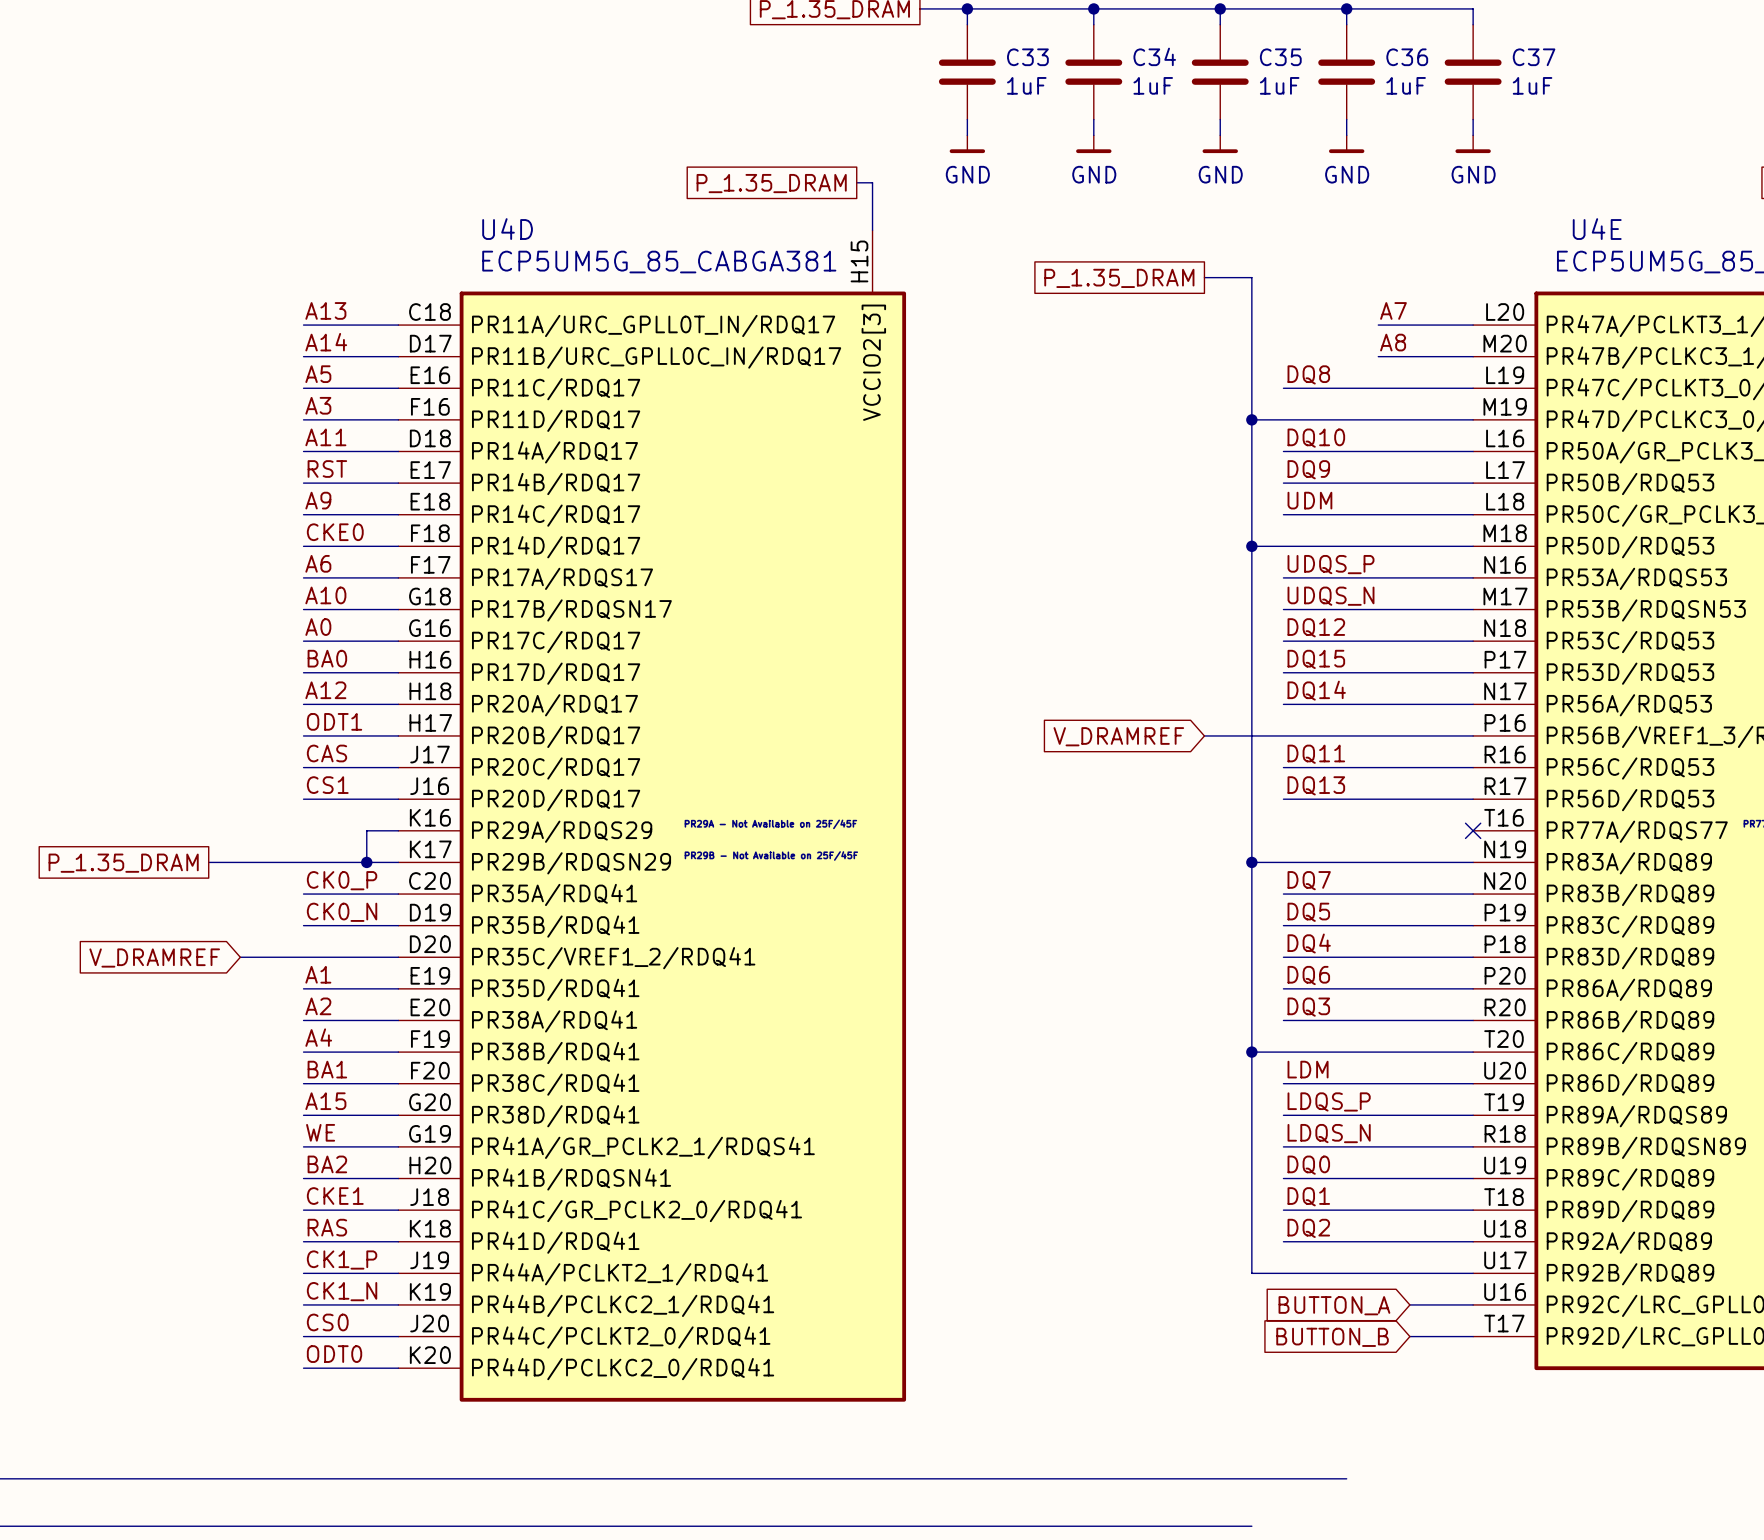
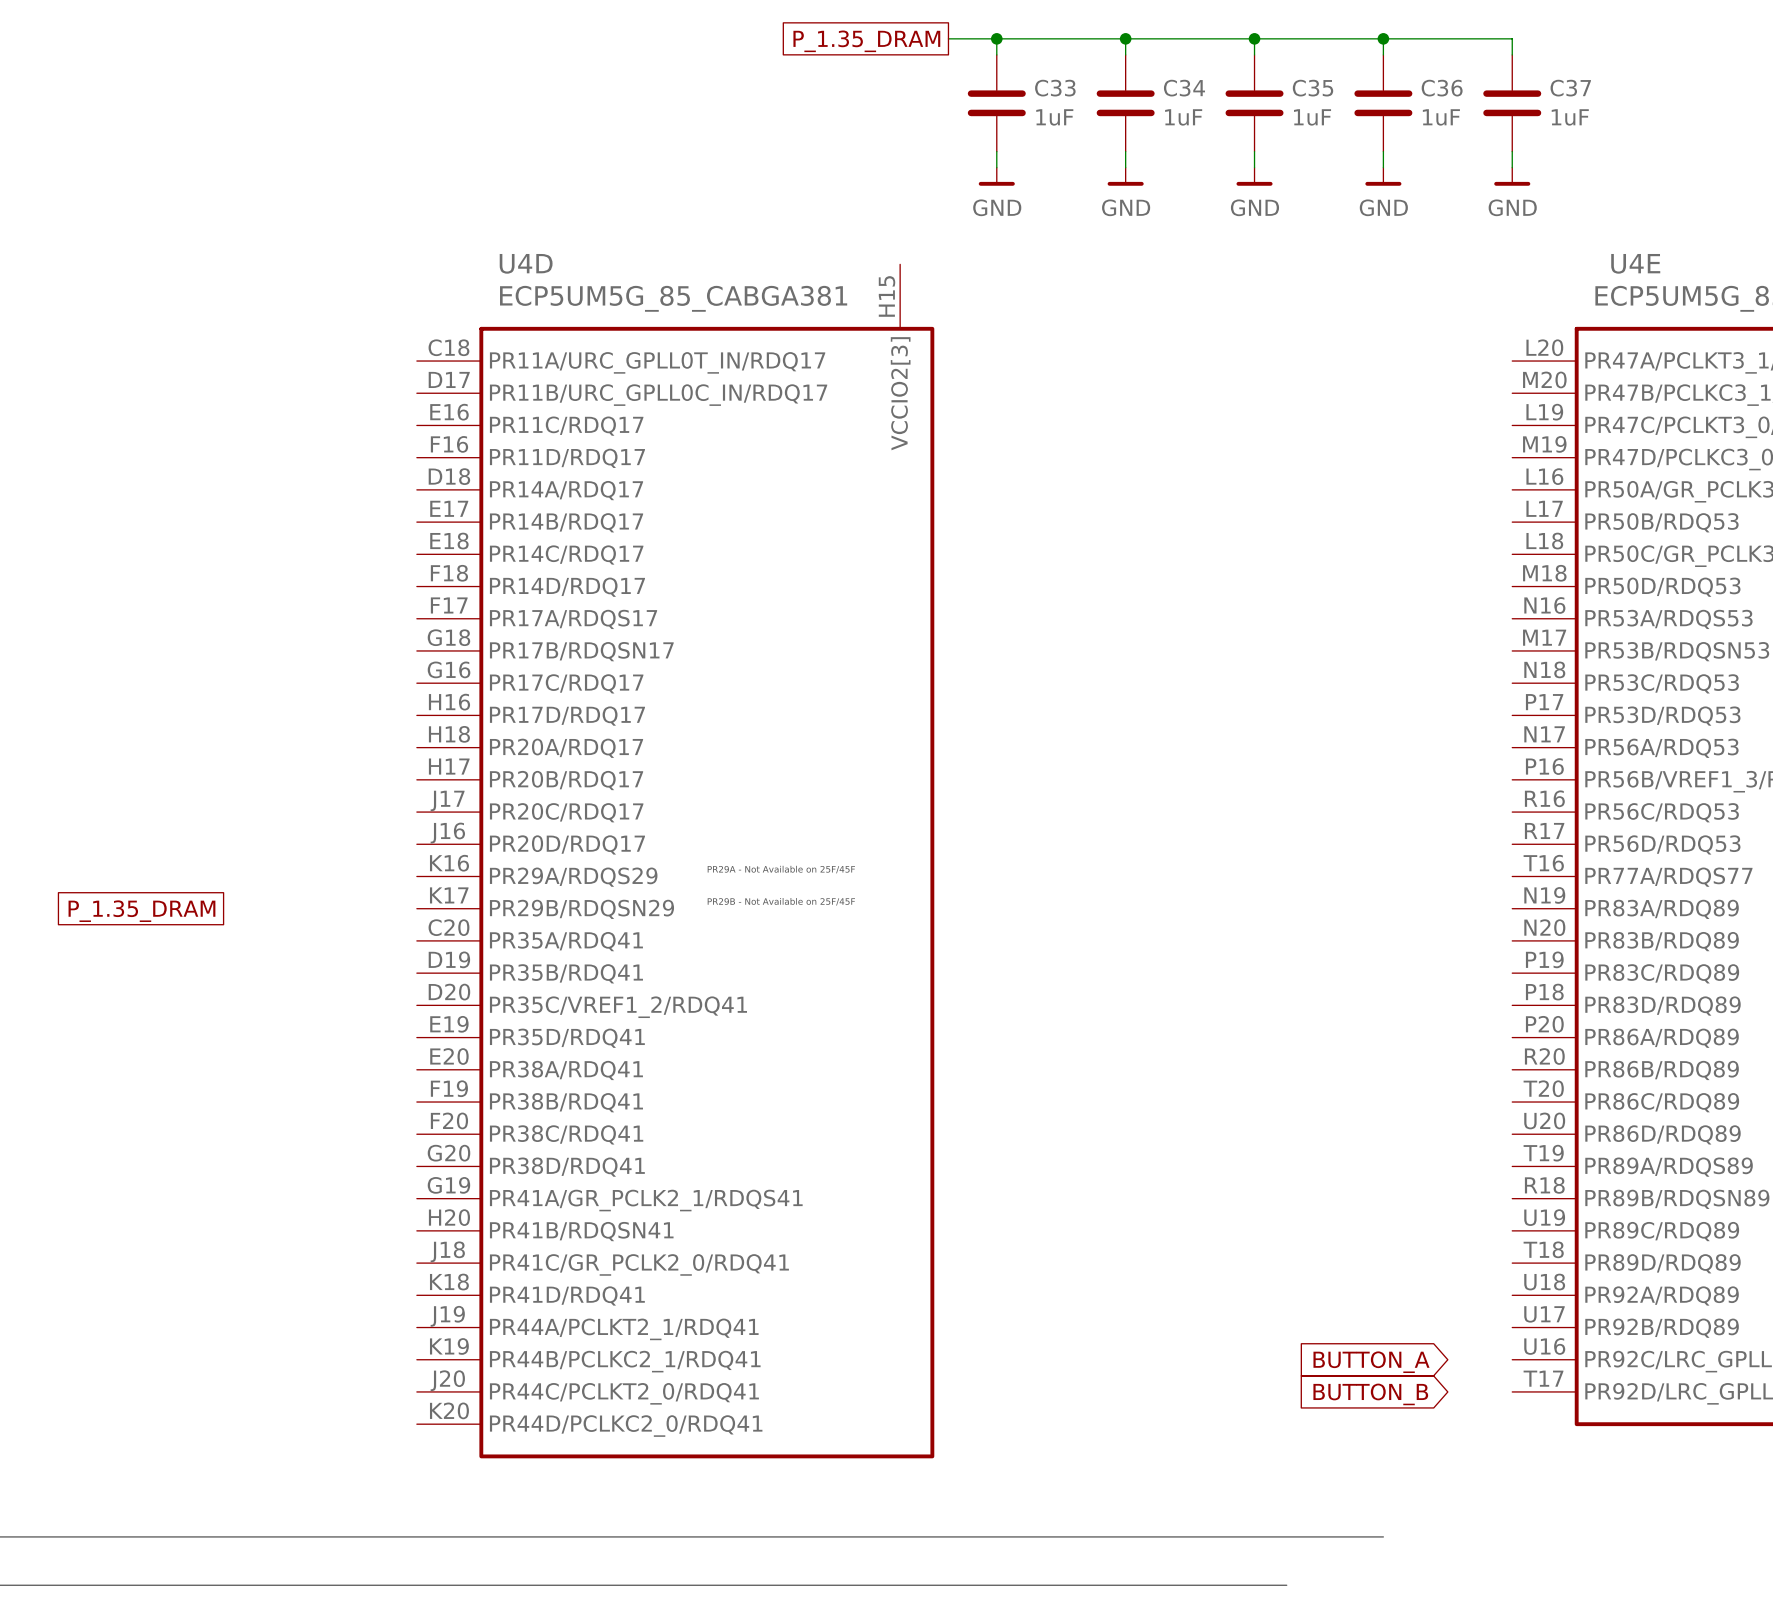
wire: (856, 182) (872, 182) (872, 230) -> none
global label: P_1.35_DRAM (771, 183) -> none
wire: (1204, 277) (1251, 277) (1251, 1273) (1473, 1273) -> none
global label: P_1.35_DRAM (1119, 278) -> none
label: A13 (325, 310) -> none
label: A7 (1393, 310) -> none
wire: (303, 325) (398, 325) -> none
wire: (1378, 325) (1473, 325) -> none
label: A14 (326, 342) -> none
label: A8 (1393, 342) -> none
wire: (303, 356) (398, 356) -> none
wire: (1378, 356) (1473, 356) -> none
label: A5 (318, 374) -> none
label: DQ8 (1308, 374) -> none
wire: (303, 388) (398, 388) -> none
wire: (1283, 388) (1473, 388) -> none
label: A3 (318, 405) -> none
wire: (303, 419) (398, 419) -> none
wire: (1251, 419) (1473, 419) -> none
junction: (1251, 419) -> none
label: A11 (325, 437) -> none
label: DQ10 (1316, 438) -> none
wire: (303, 451) (398, 451) -> none
wire: (1283, 451) (1473, 451) -> none
label: RST (327, 468) -> none
label: DQ9 (1308, 469) -> none
wire: (303, 483) (398, 483) -> none
wire: (1283, 483) (1473, 483) -> none
label: A9 (318, 500) -> none
label: UDM (1309, 500) -> none
wire: (303, 514) (398, 514) -> none
wire: (1283, 514) (1473, 514) -> none
label: CKE0 (335, 532) -> none
wire: (303, 546) (398, 546) -> none
wire: (1251, 546) (1473, 546) -> none
junction: (1251, 546) -> none
label: A6 (318, 563) -> none
label: UDQS_P (1331, 564) -> none
wire: (303, 577) (398, 577) -> none
wire: (1283, 577) (1473, 577) -> none
label: A10 (325, 595) -> none
label: UDQS_N (1331, 596) -> none
wire: (303, 609) (398, 609) -> none
wire: (1283, 609) (1473, 609) -> none
label: A0 (318, 627) -> none
label: DQ12 (1316, 627) -> none
wire: (303, 641) (398, 641) -> none
wire: (1283, 641) (1473, 641) -> none
label: BA0 (327, 658) -> none
label: DQ15 (1316, 659) -> none
wire: (303, 672) (398, 672) -> none
wire: (1283, 672) (1473, 672) -> none
label: A12 (325, 690) -> none
label: DQ14 (1316, 690) -> none
wire: (303, 704) (398, 704) -> none
wire: (1283, 704) (1473, 704) -> none
label: ODT1 (334, 721) -> none
wire: (303, 735) (398, 735) -> none
wire: (1204, 735) (1473, 735) -> none
global label: V_DRAMREF (1118, 736) -> none
label: CAS (327, 753) -> none
label: DQ11 (1316, 754) -> none
wire: (303, 767) (398, 767) -> none
wire: (1283, 767) (1473, 767) -> none
label: CS1 (327, 785) -> none
label: DQ13 (1316, 785) -> none
wire: (303, 799) (398, 799) -> none
wire: (1283, 799) (1473, 799) -> none
wire: (398, 830) (366, 830) (366, 862) -> none
no-connect mark: (1473, 830) -> none
wire: (208, 862) (398, 862) -> none
junction: (366, 862) -> none
wire: (1251, 862) (1473, 862) -> none
junction: (1251, 862) -> none
label: CK0_P (342, 880) -> none
label: DQ7 (1309, 880) -> none
wire: (303, 894) (398, 894) -> none
wire: (1283, 894) (1473, 894) -> none
label: CK0_N (342, 912) -> none
label: DQ5 (1308, 912) -> none
wire: (303, 925) (398, 925) -> none
wire: (1283, 925) (1473, 925) -> none
label: DQ4 (1309, 943) -> none
wire: (240, 957) (398, 957) -> none
wire: (1283, 957) (1473, 957) -> none
global label: V_DRAMREF (154, 958) -> none
label: A1 (318, 974) -> none
label: DQ6 (1308, 975) -> none
wire: (303, 988) (398, 988) -> none
wire: (1283, 988) (1473, 988) -> none
label: A2 (318, 1006) -> none
label: DQ3 (1308, 1007) -> none
wire: (303, 1020) (398, 1020) -> none
wire: (1283, 1020) (1473, 1020) -> none
label: A4 (318, 1037) -> none
wire: (303, 1052) (398, 1052) -> none
wire: (1251, 1052) (1473, 1052) -> none
junction: (1251, 1052) -> none
label: BA1 (327, 1069) -> none
label: LDM (1308, 1069) -> none
wire: (303, 1083) (398, 1083) -> none
wire: (1283, 1083) (1473, 1083) -> none
label: A15 (325, 1101) -> none
label: LDQS_P (1329, 1101) -> none
wire: (303, 1115) (398, 1115) -> none
wire: (1283, 1115) (1473, 1115) -> none
label: WE (320, 1132) -> none
label: LDQS_N (1329, 1133) -> none
wire: (303, 1146) (398, 1146) -> none
wire: (1283, 1146) (1473, 1146) -> none
label: BA2 (327, 1164) -> none
label: DQ0 (1308, 1165) -> none
wire: (303, 1178) (398, 1178) -> none
wire: (1283, 1178) (1473, 1178) -> none
label: CKE1 (335, 1196) -> none
label: DQ1 (1308, 1196) -> none
wire: (303, 1210) (398, 1210) -> none
wire: (1283, 1210) (1473, 1210) -> none
label: RAS (327, 1227) -> none
label: DQ2 (1308, 1228) -> none
wire: (303, 1241) (398, 1241) -> none
wire: (1283, 1241) (1473, 1241) -> none
label: CK1_P (342, 1260) -> none
wire: (303, 1273) (398, 1273) -> none
label: CK1_N (342, 1291) -> none
wire: (303, 1304) (398, 1304) -> none
wire: (1409, 1304) (1473, 1304) -> none
label: CS0 (327, 1322) -> none
wire: (303, 1336) (398, 1336) -> none
wire: (1409, 1336) (1473, 1336) -> none
label: ODT0 (334, 1354) -> none
wire: (303, 1368) (398, 1368) -> none

